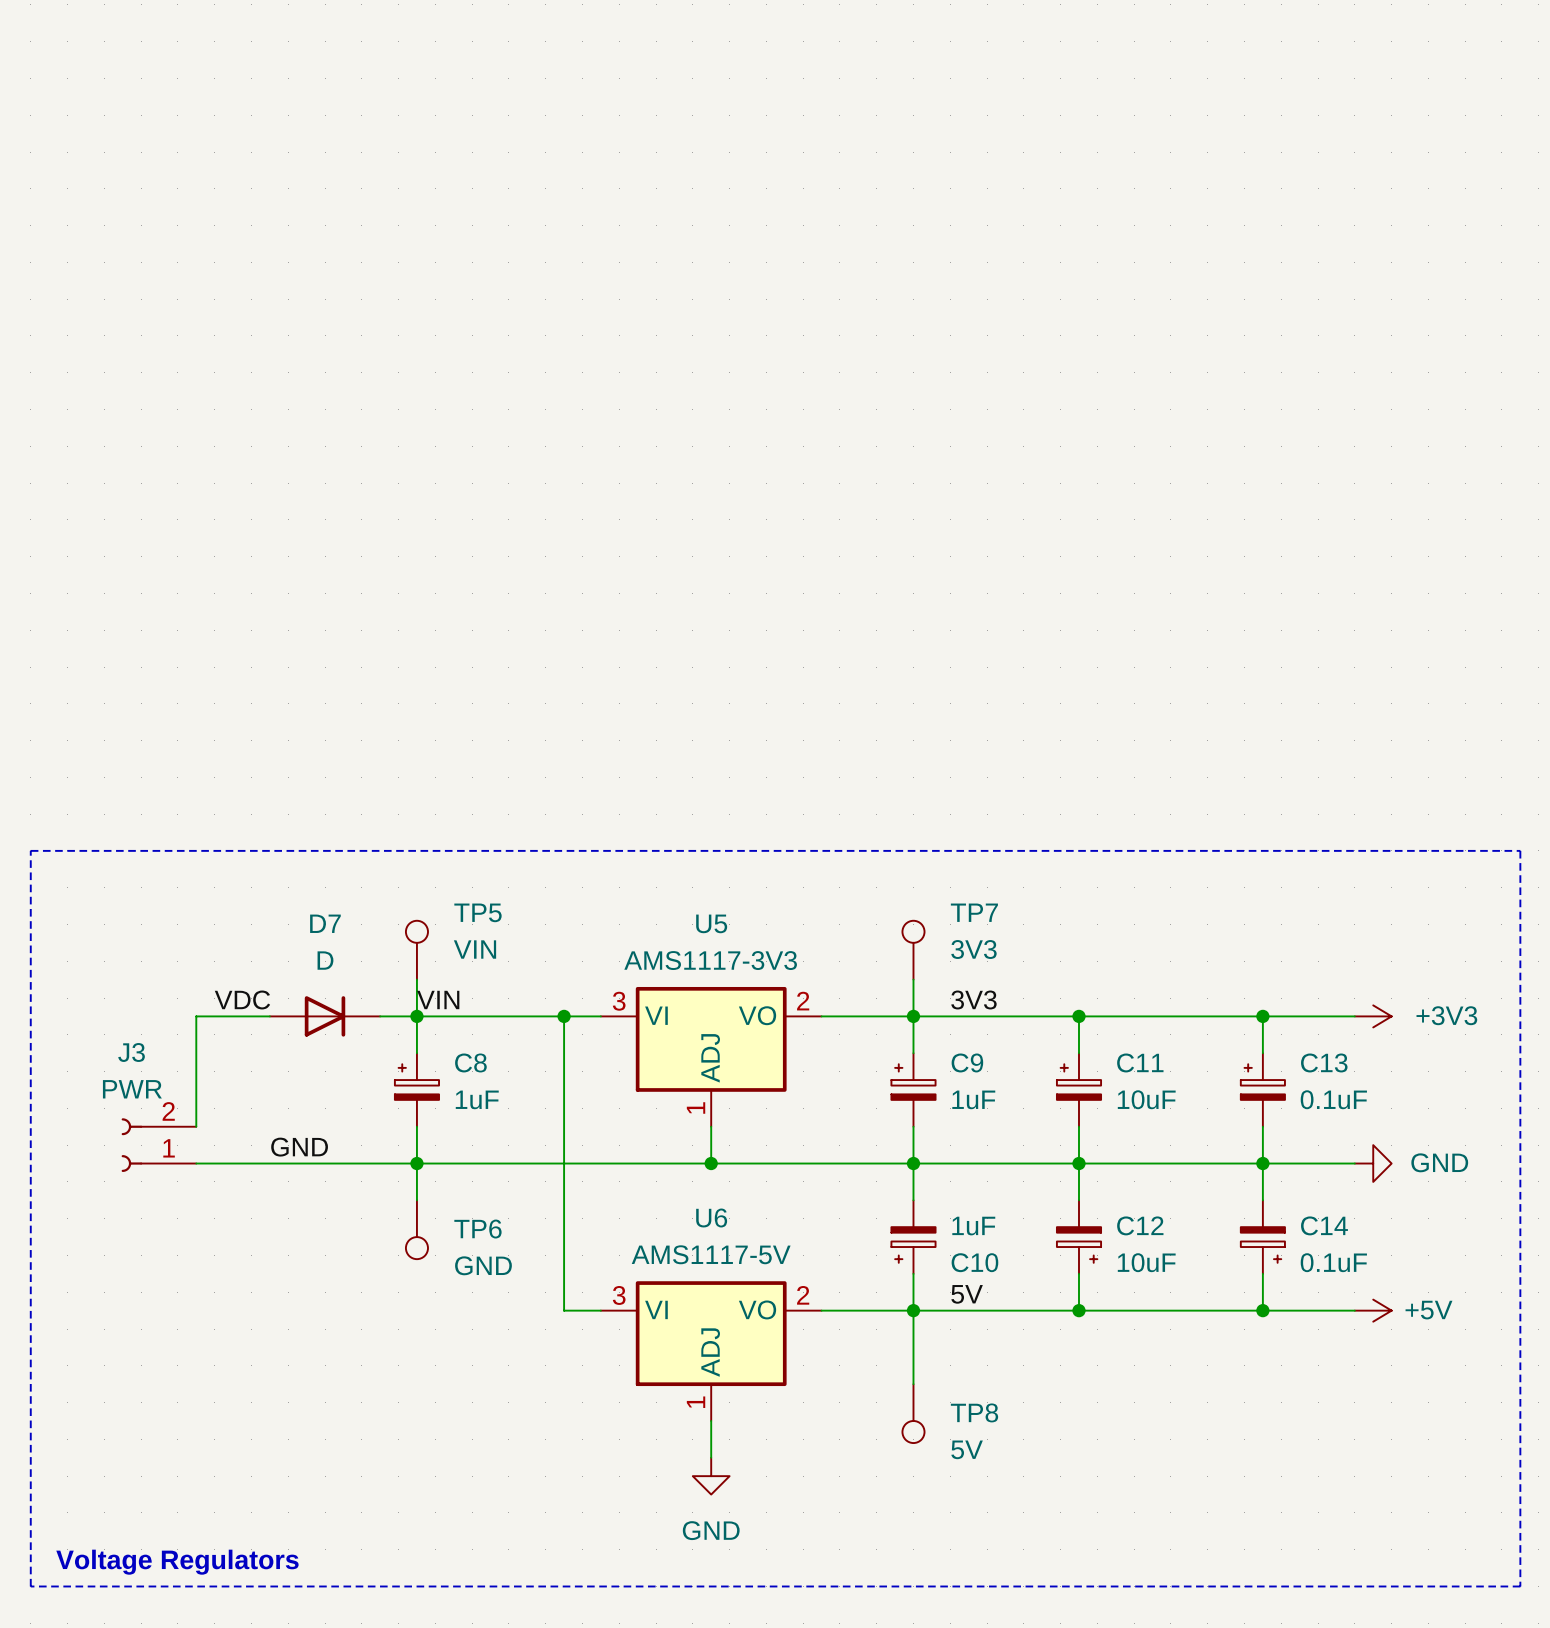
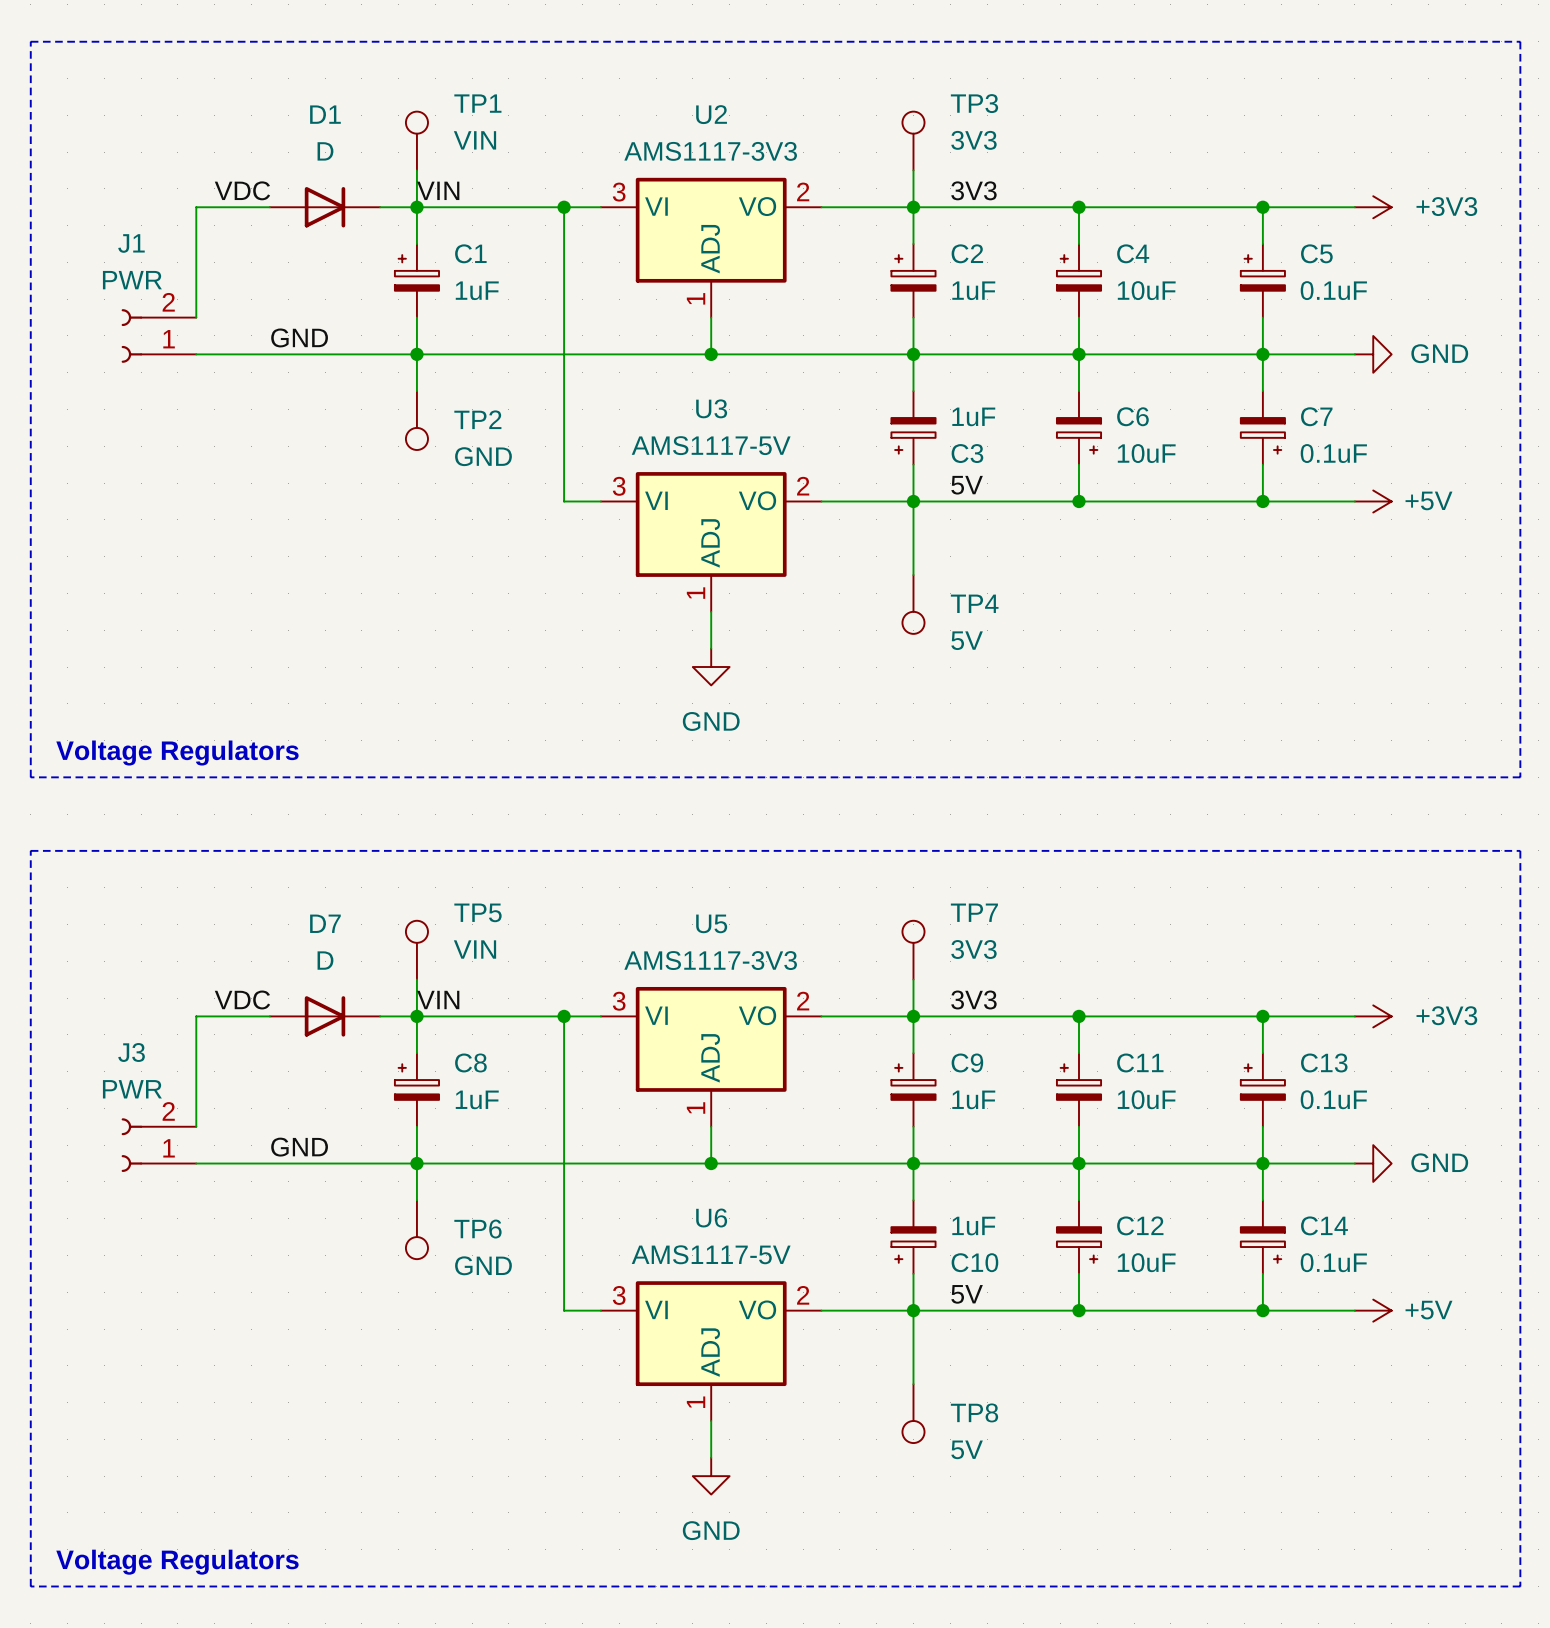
line: none -> (30, 41) (1520, 41) (1520, 777) (30, 777) (30, 41)
TP1: none -> VIN (416, 141)
TP3: none -> 3V3 (913, 141)
wire: none -> (416, 170) (416, 244)
wire: none -> (913, 170) (913, 244)
label: none -> VDC (242, 190)
label: none -> VIN (438, 190)
label: none -> 3V3 (973, 190)
wire: none -> (269, 207) (196, 207) (196, 317)
D1: none -> D (325, 207)
wire: none -> (380, 207) (600, 207)
junction: none -> (416, 207)
wire: none -> (564, 207) (564, 501) (600, 501)
junction: none -> (564, 207)
wire: none -> (821, 207) (1354, 207)
junction: none -> (913, 207)
wire: none -> (1078, 207) (1078, 244)
junction: none -> (1078, 207)
wire: none -> (1262, 207) (1262, 244)
junction: none -> (1262, 207)
power symbol: none -> +3V3 (1373, 207)
U2: none -> AMS1117-3V3 (711, 247)
C1: none -> 1uF (416, 280)
C2: none -> 1uF (913, 280)
C4: none -> 10uF (1078, 280)
C5: none -> 0.1uF (1262, 280)
wire: none -> (416, 317) (416, 391)
wire: none -> (711, 317) (711, 354)
wire: none -> (913, 317) (913, 391)
wire: none -> (1078, 317) (1078, 391)
wire: none -> (1262, 317) (1262, 391)
J1: none -> PWR (158, 335)
label: none -> GND (299, 337)
wire: none -> (196, 354) (1354, 354)
junction: none -> (416, 354)
junction: none -> (711, 354)
junction: none -> (913, 354)
junction: none -> (1078, 354)
junction: none -> (1262, 354)
power symbol: none -> GND (1373, 354)
TP2: none -> GND (416, 420)
C3: none -> 1uF (913, 427)
C6: none -> 10uF (1078, 427)
C7: none -> 0.1uF (1262, 427)
wire: none -> (913, 464) (913, 575)
wire: none -> (1078, 464) (1078, 501)
wire: none -> (1262, 464) (1262, 501)
label: none -> 5V (967, 485)
wire: none -> (821, 501) (1354, 501)
junction: none -> (913, 501)
junction: none -> (1078, 501)
junction: none -> (1262, 501)
power symbol: none -> +5V (1373, 501)
U3: none -> AMS1117-5V (711, 541)
TP4: none -> 5V (913, 604)
wire: none -> (711, 611) (711, 648)
power symbol: none -> GND (711, 667)
text: none -> Voltage Regulators (177, 753)

